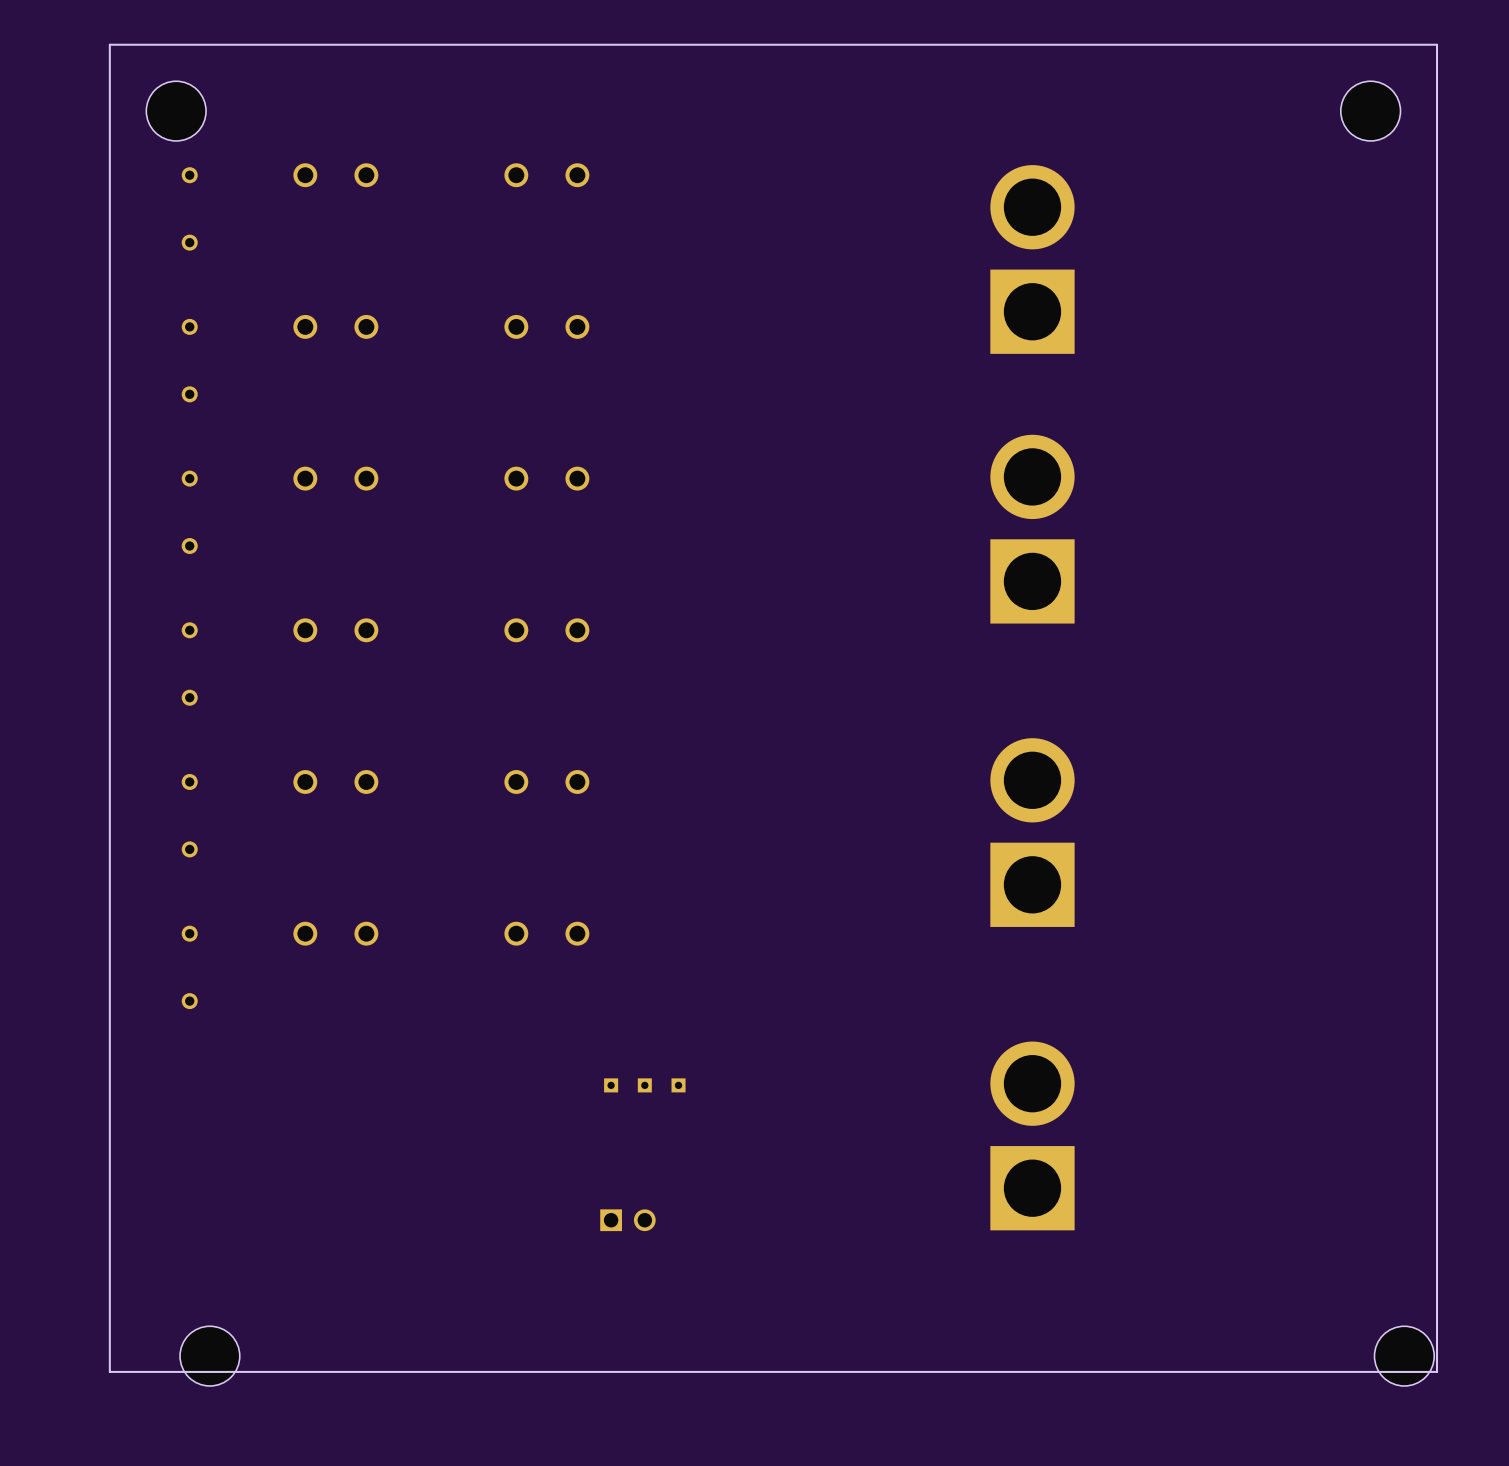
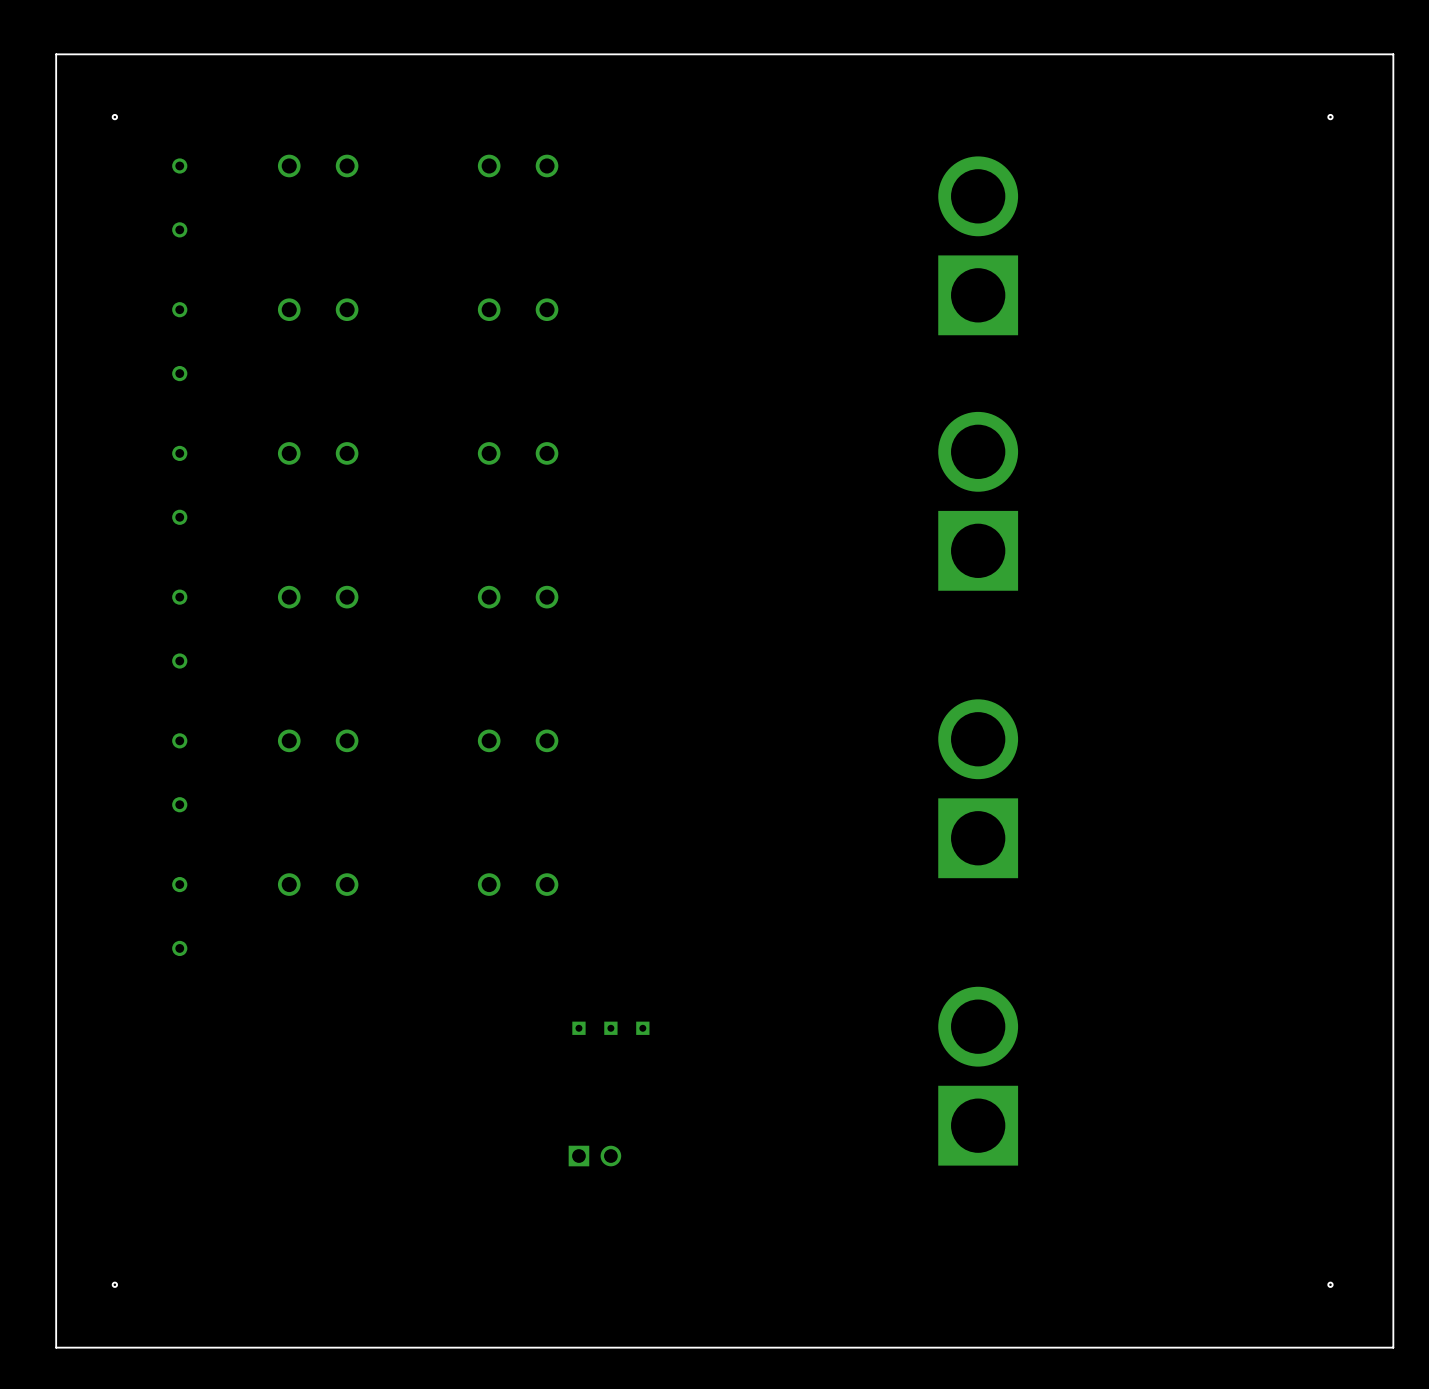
board edge: (1437, 44) (109, 44) (109, 1371) (1437, 1371) (1437, 44) -> (1393, 54) (1393, 1347) (56, 1347) (56, 54) (1393, 54)
hole: (176, 111) -> none
hole: (1370, 111) -> none
hole: none -> (114, 117)
hole: none -> (1330, 117)
hole size: [1374, 1326, 1435, 1386] -> [1328, 1282, 1333, 1287]
hole: none -> (114, 1284)
hole: (209, 1356) -> none

